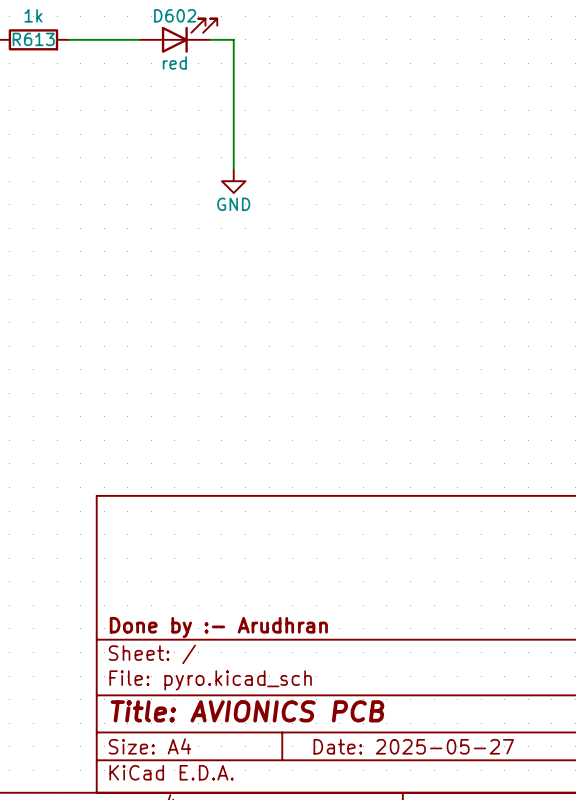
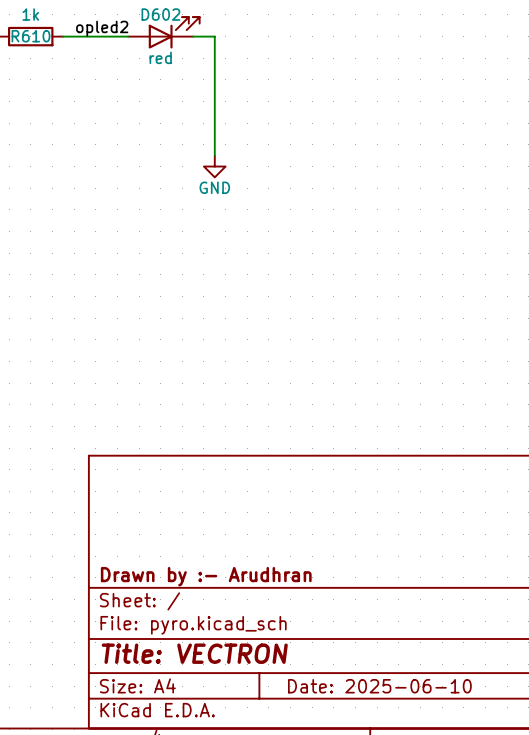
label: none -> opled2 (102, 28)
R613 name: R613 (33, 39) -> R610 (31, 36)
title block: Done by :- Arudhran (218, 627) -> Drawn by :- Arudhran (206, 576)
title block: Title: AVIONICS PCB (247, 711) -> Title: VECTRON (194, 653)
title block: Date: 2025-05-27 (413, 746) -> Date: 2025-06-10 (379, 686)

